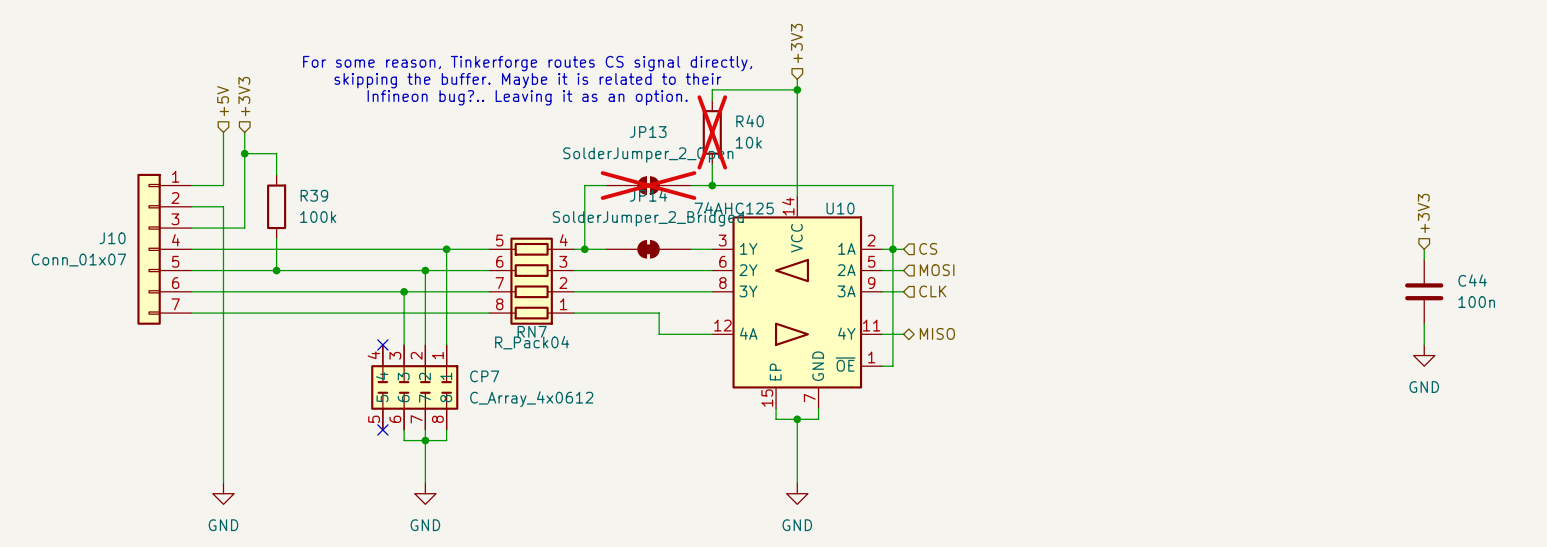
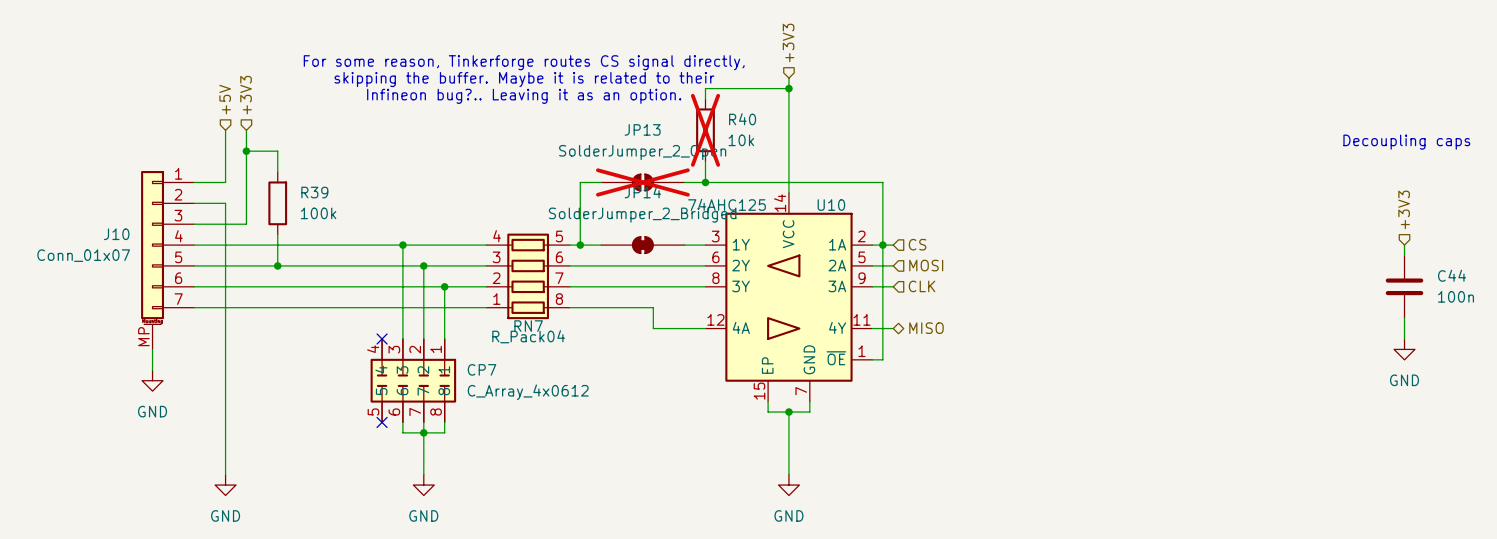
text: none -> Decoupling caps (1406, 142)
J10 symbol: [137, 173, 192, 325] -> [141, 171, 195, 350]
junction: none -> (402, 245)
wire: (446, 249) (446, 291) -> (402, 245) (402, 286)
junction: (446, 249) -> none
RN7 flip: as is (531, 281) -> left-right (528, 276)
junction: (404, 291) -> none
junction: none -> (444, 286)
wire: none -> (152, 349) (152, 370)
power symbol: none -> GND (152, 380)

